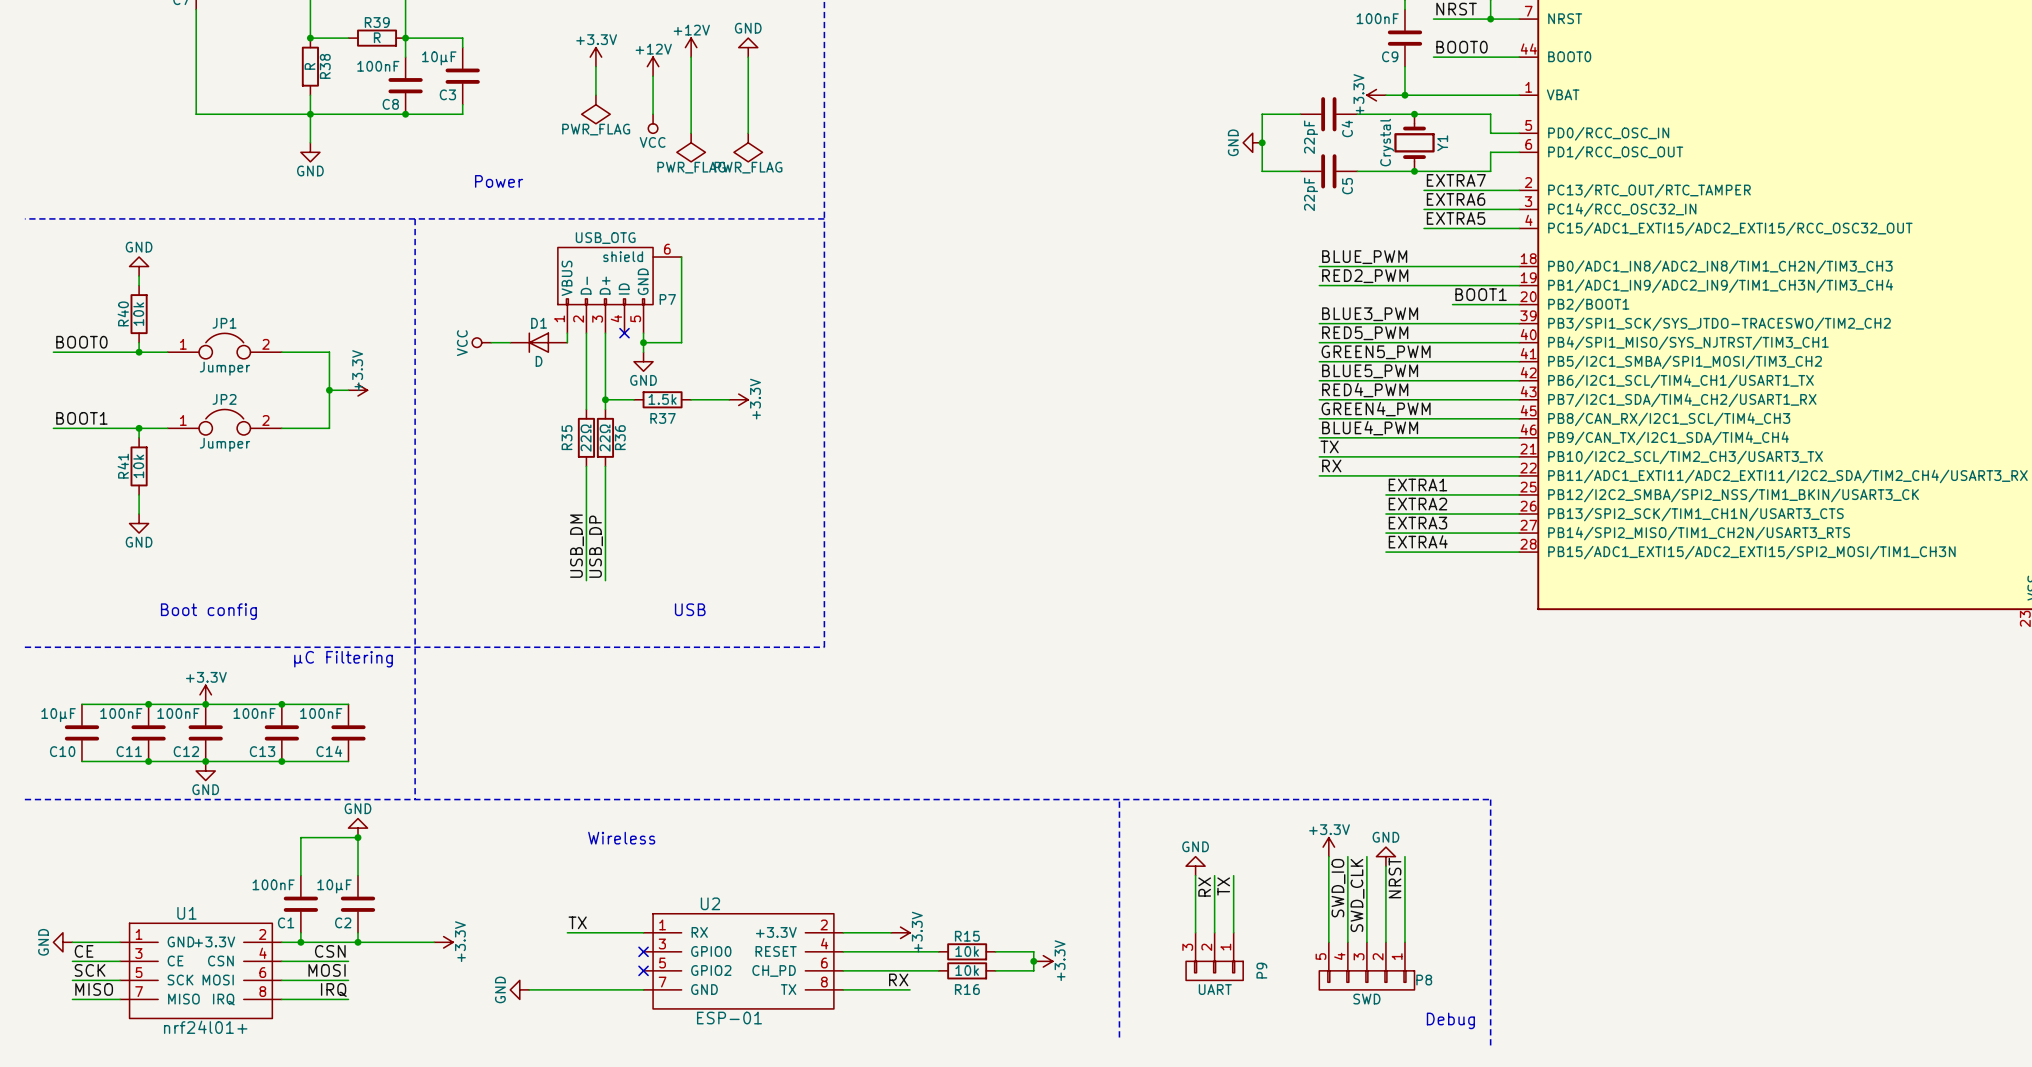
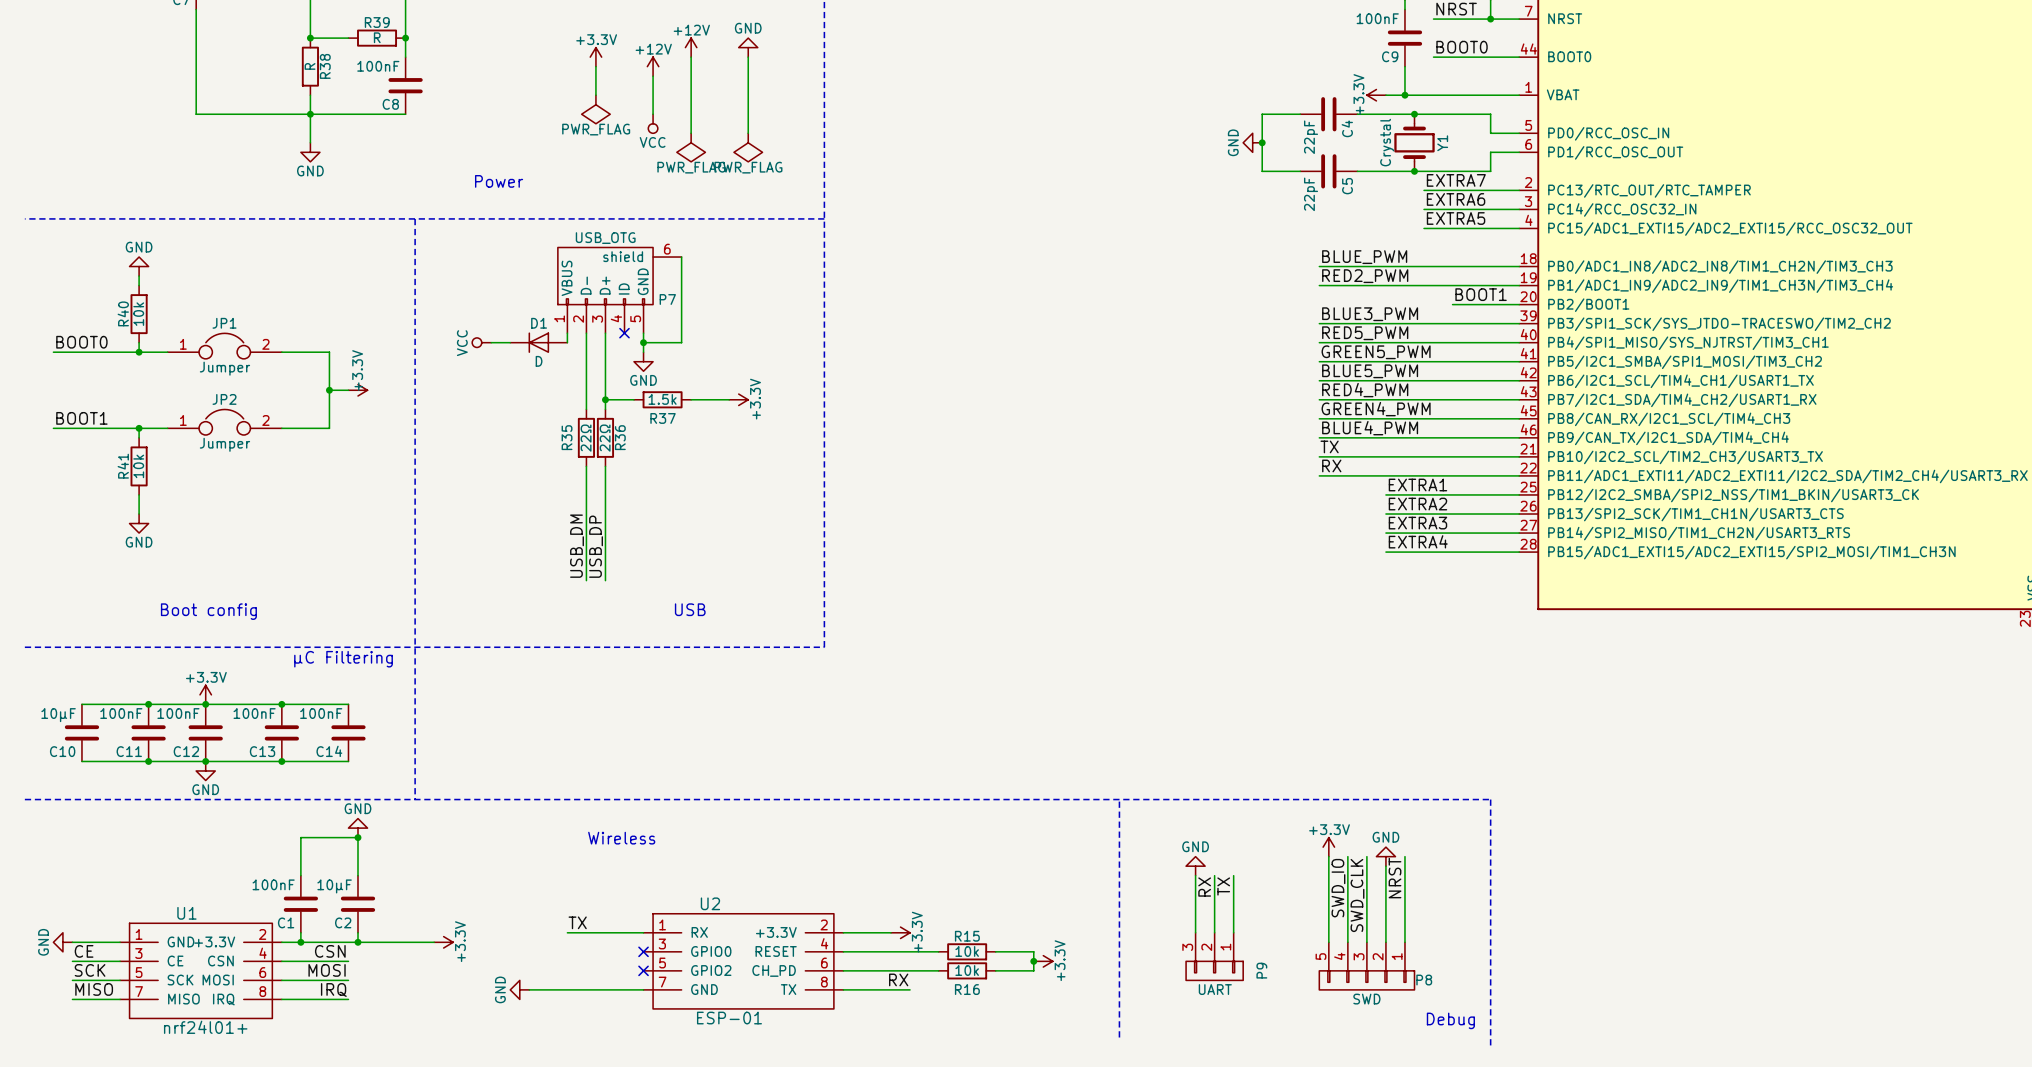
wire: (405, 38) (462, 38) (462, 47) -> none
C3: 10µF (462, 76) -> none
wire: (462, 104) (462, 114) (405, 114) -> none
junction: (405, 114) -> none

